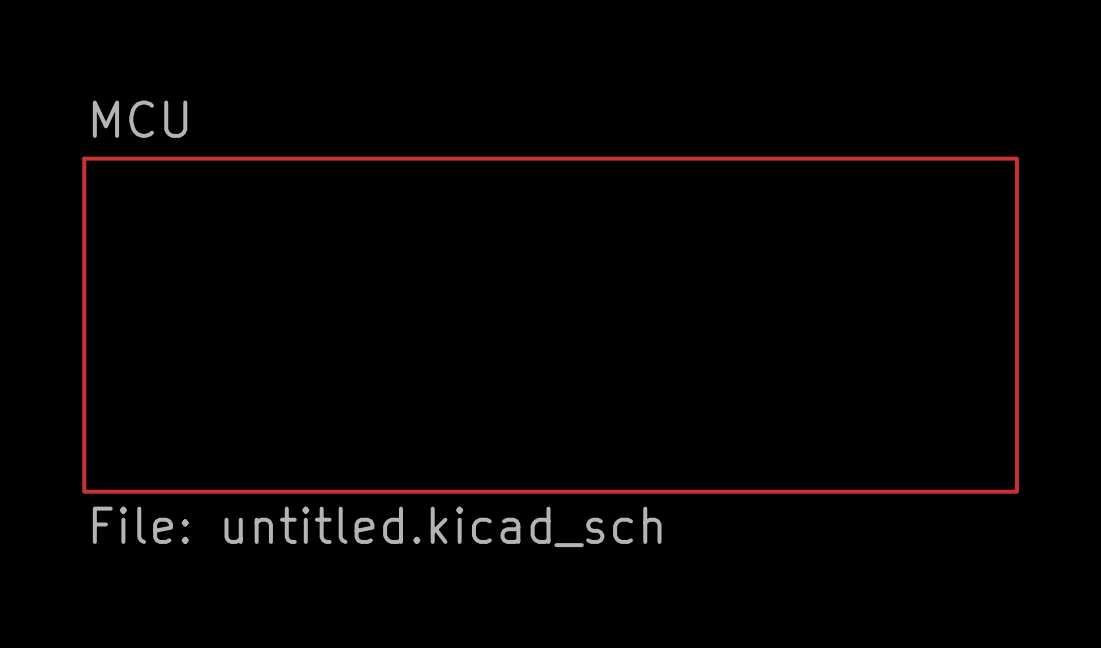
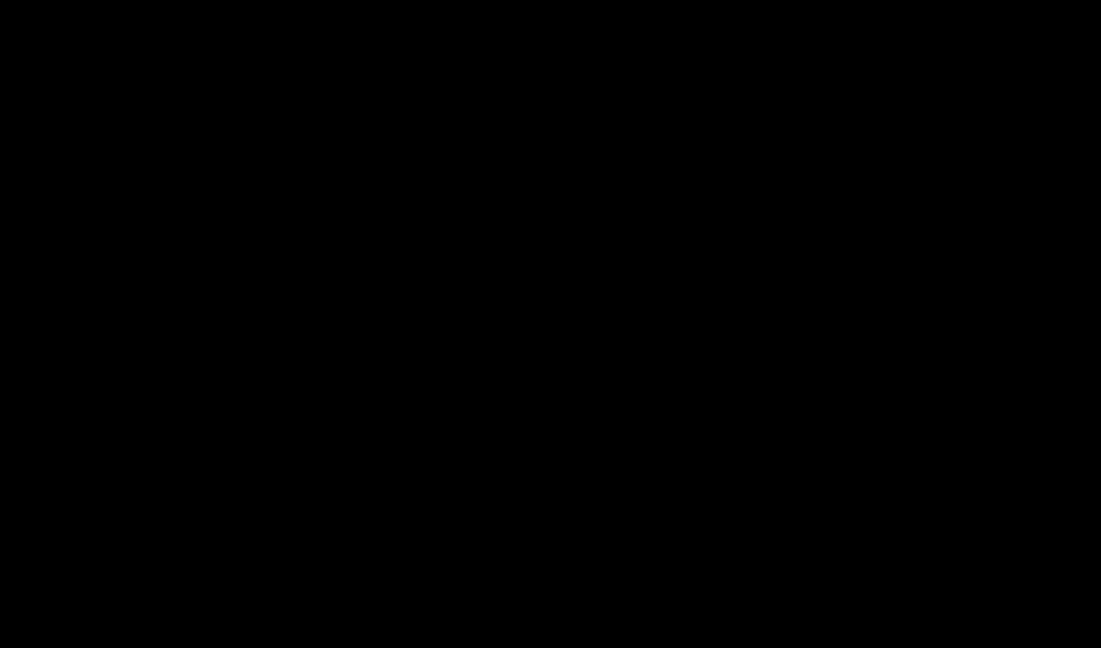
sheet MCU: File: untitled.kicad_sch (550, 325) -> none

